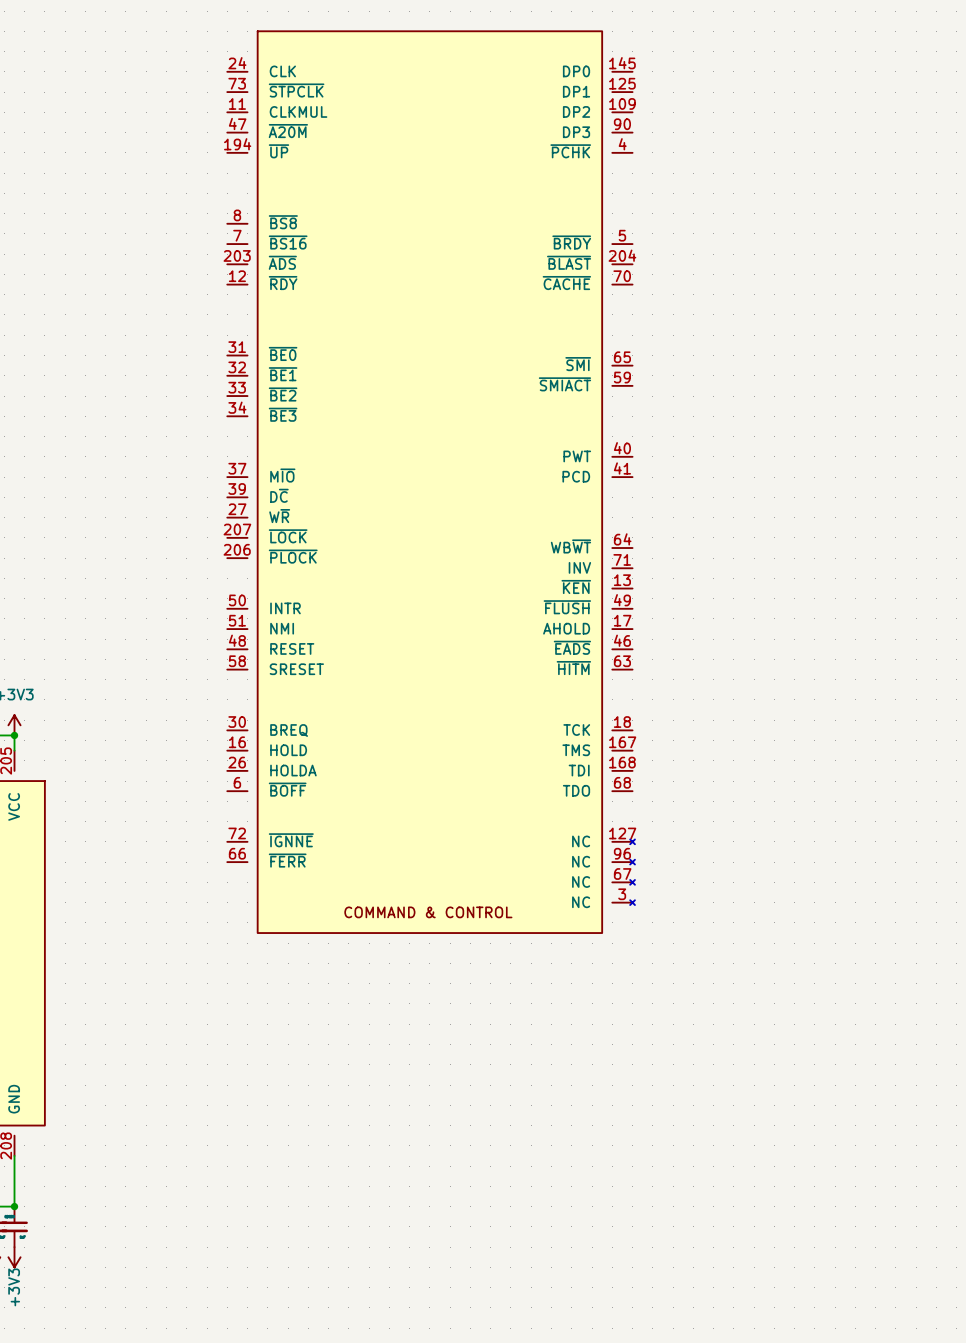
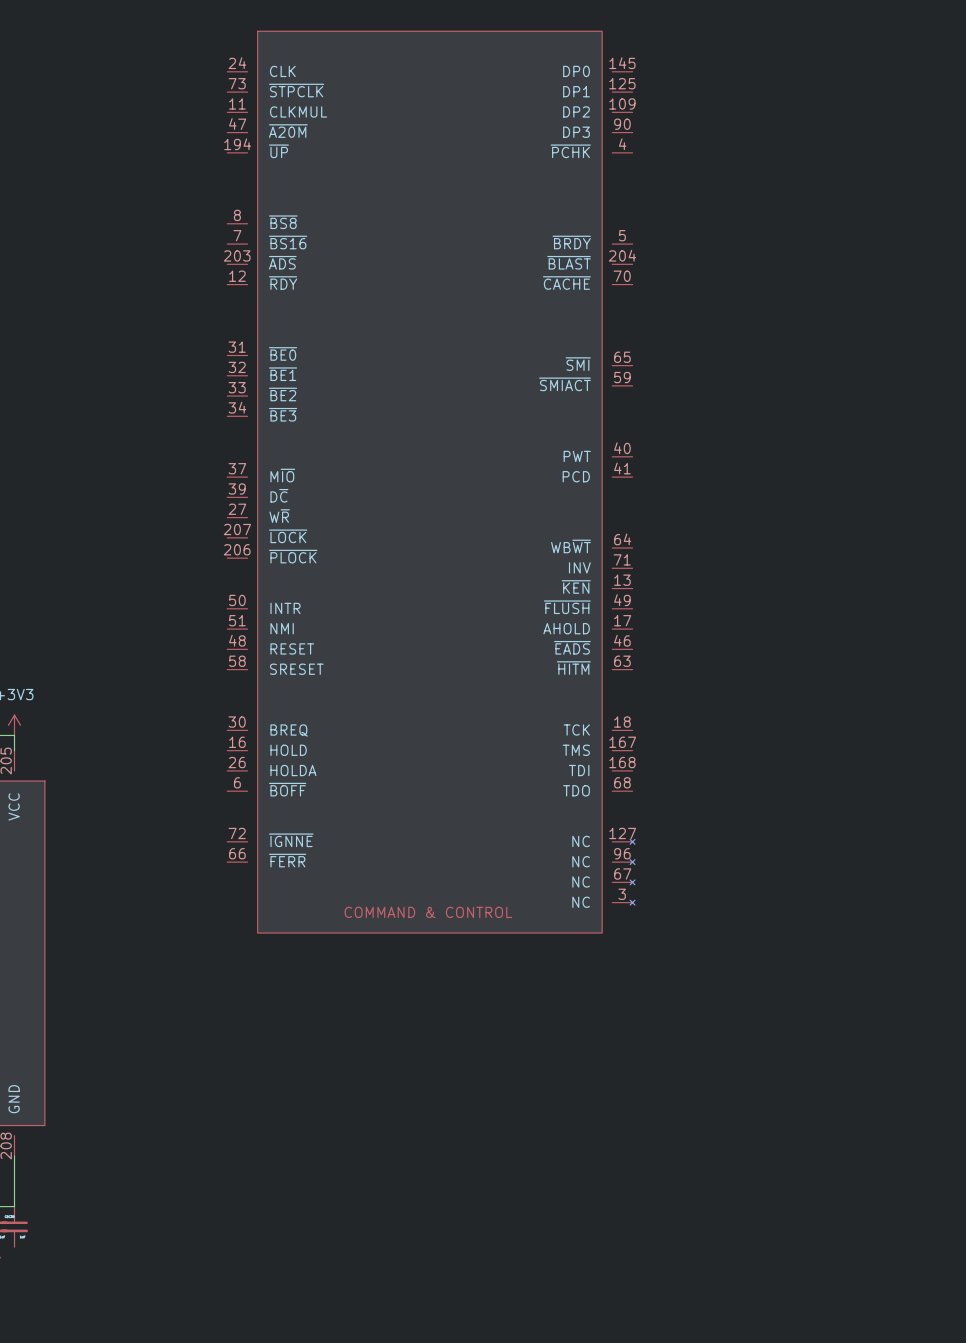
junction: (14, 735) -> none
junction: (14, 1206) -> none
power symbol: +3V3 (14, 1257) -> none

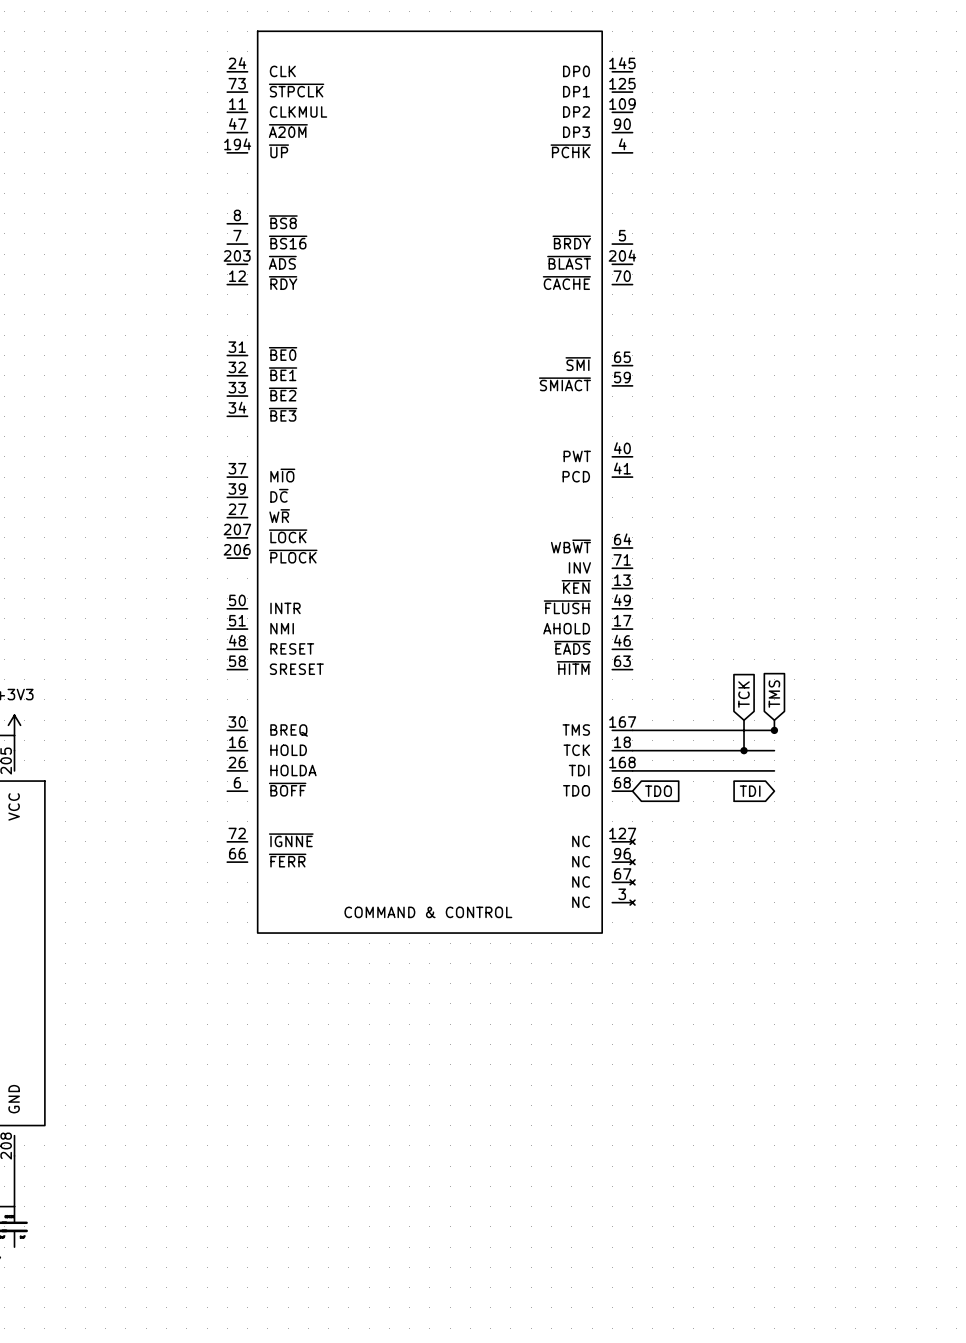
global label: none -> TCK (744, 694)
global label: none -> TMS (774, 694)
wire: none -> (744, 720) (744, 750)
wire: none -> (774, 720) (774, 730) (632, 730)
part pin number: 18 (622, 722) -> 167 (622, 722)
part pin name: TCK (576, 730) -> TMS (576, 730)
junction: none -> (774, 730)
part pin number: 167 (622, 742) -> 18 (622, 742)
part pin name: TMS (576, 750) -> TCK (576, 750)
wire: none -> (632, 750) (774, 750)
junction: none -> (744, 750)
wire: none -> (632, 770) (774, 770)
global label: none -> TDO (658, 791)
global label: none -> TDI (750, 791)

